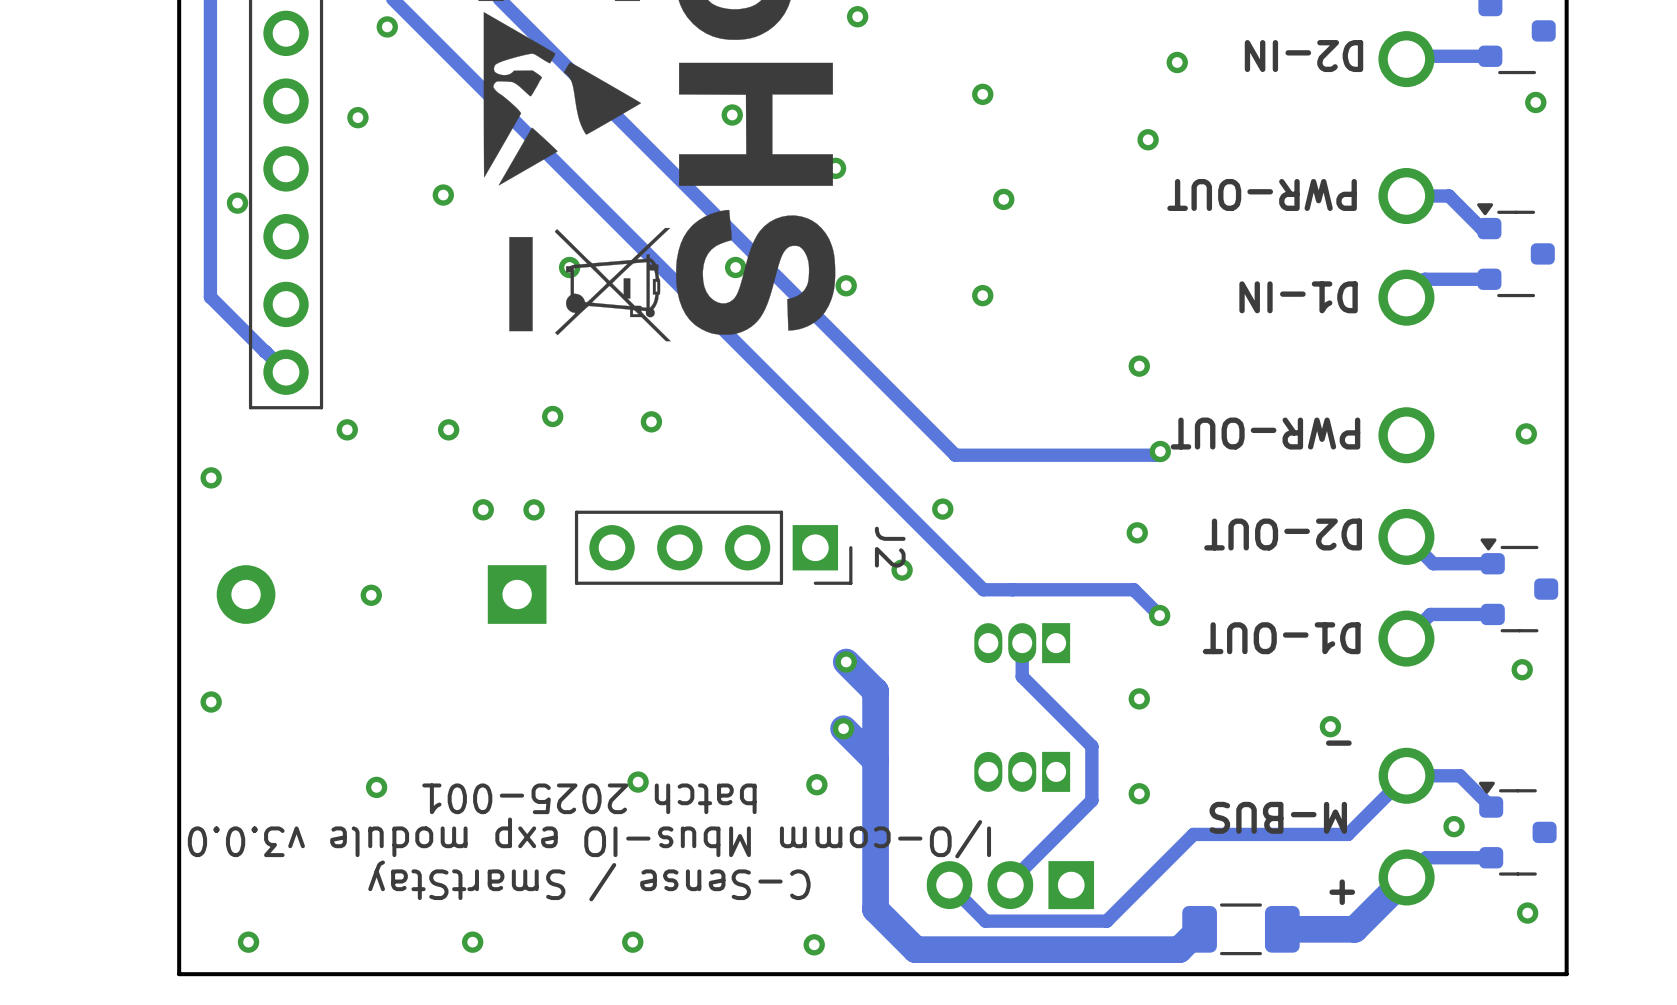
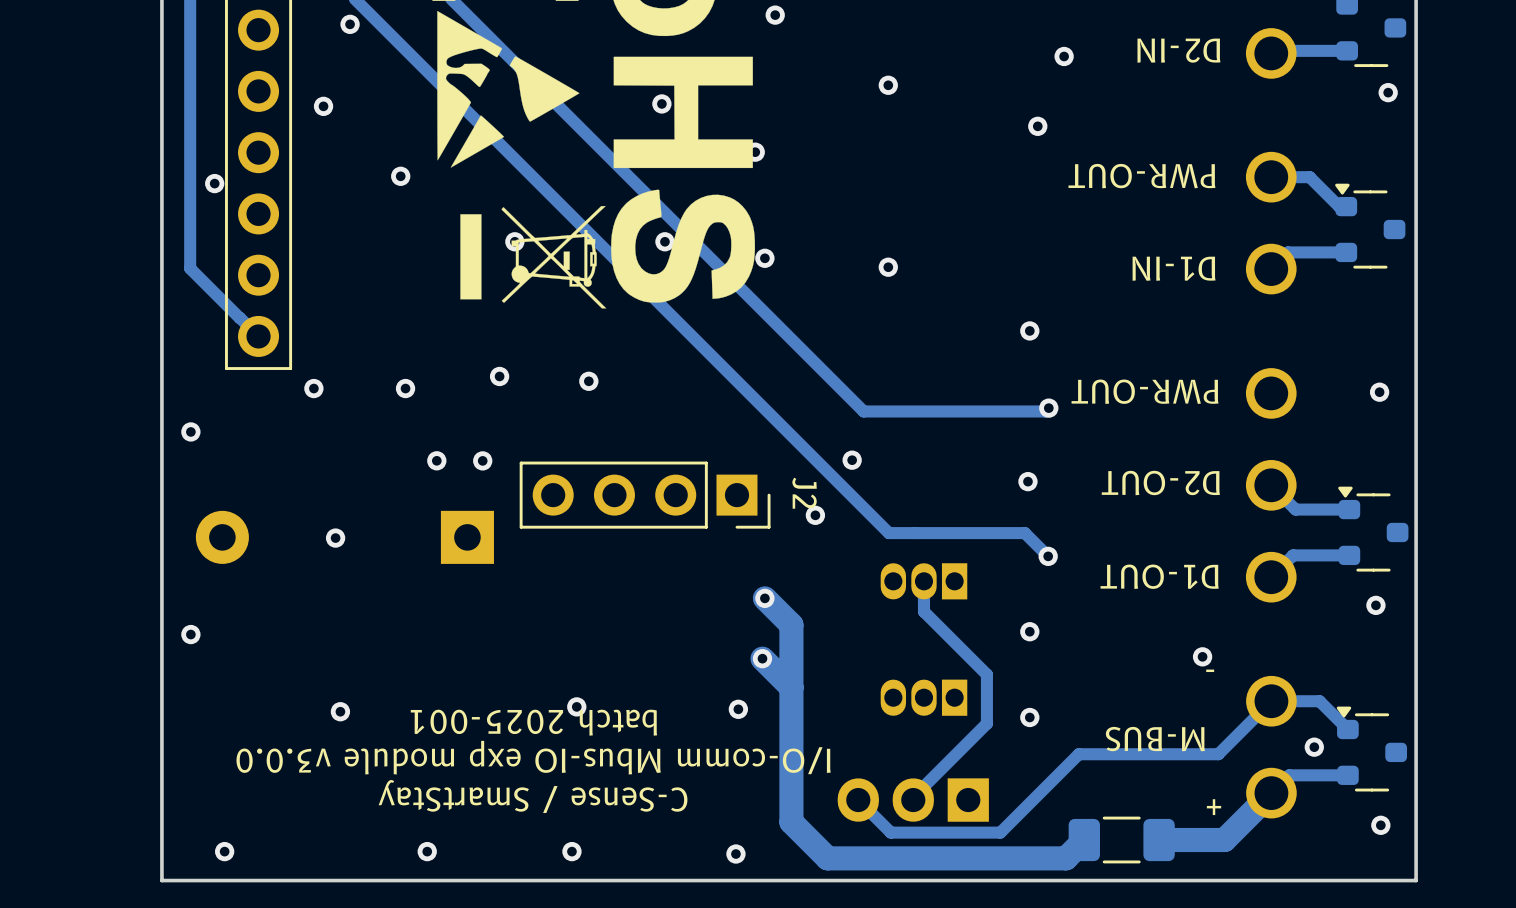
via: (1003, 199) -> none

